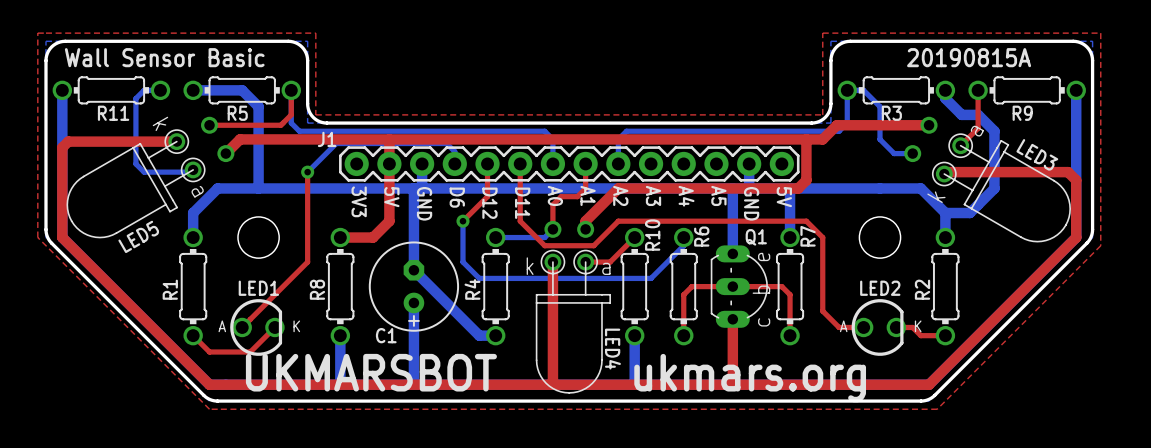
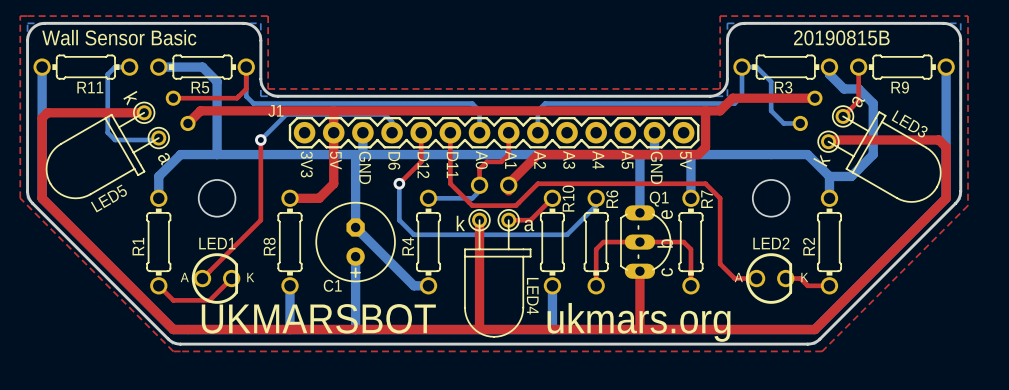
text: 20190815A (969, 57) -> 20190815B (841, 37)
part footprint: [544, 220, 595, 238] -> [470, 176, 518, 194]

